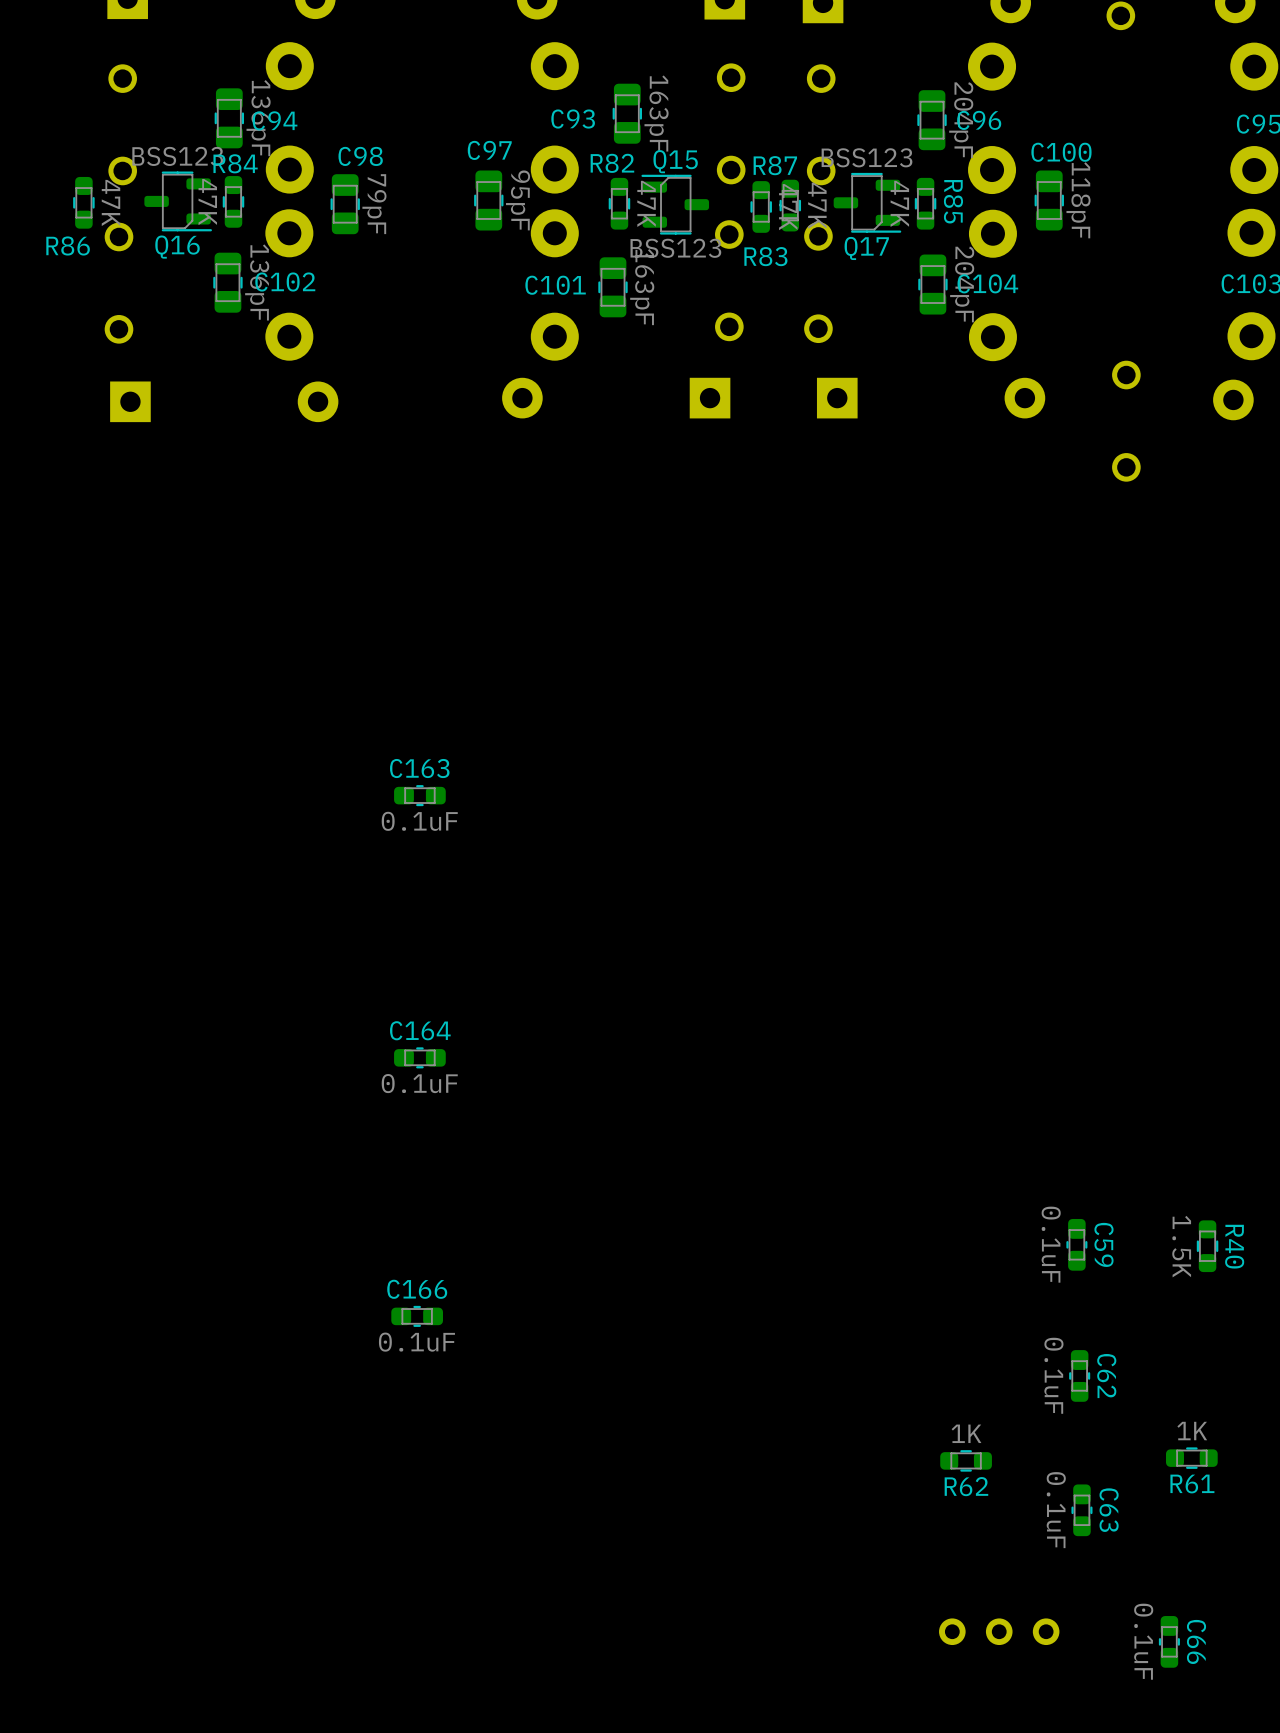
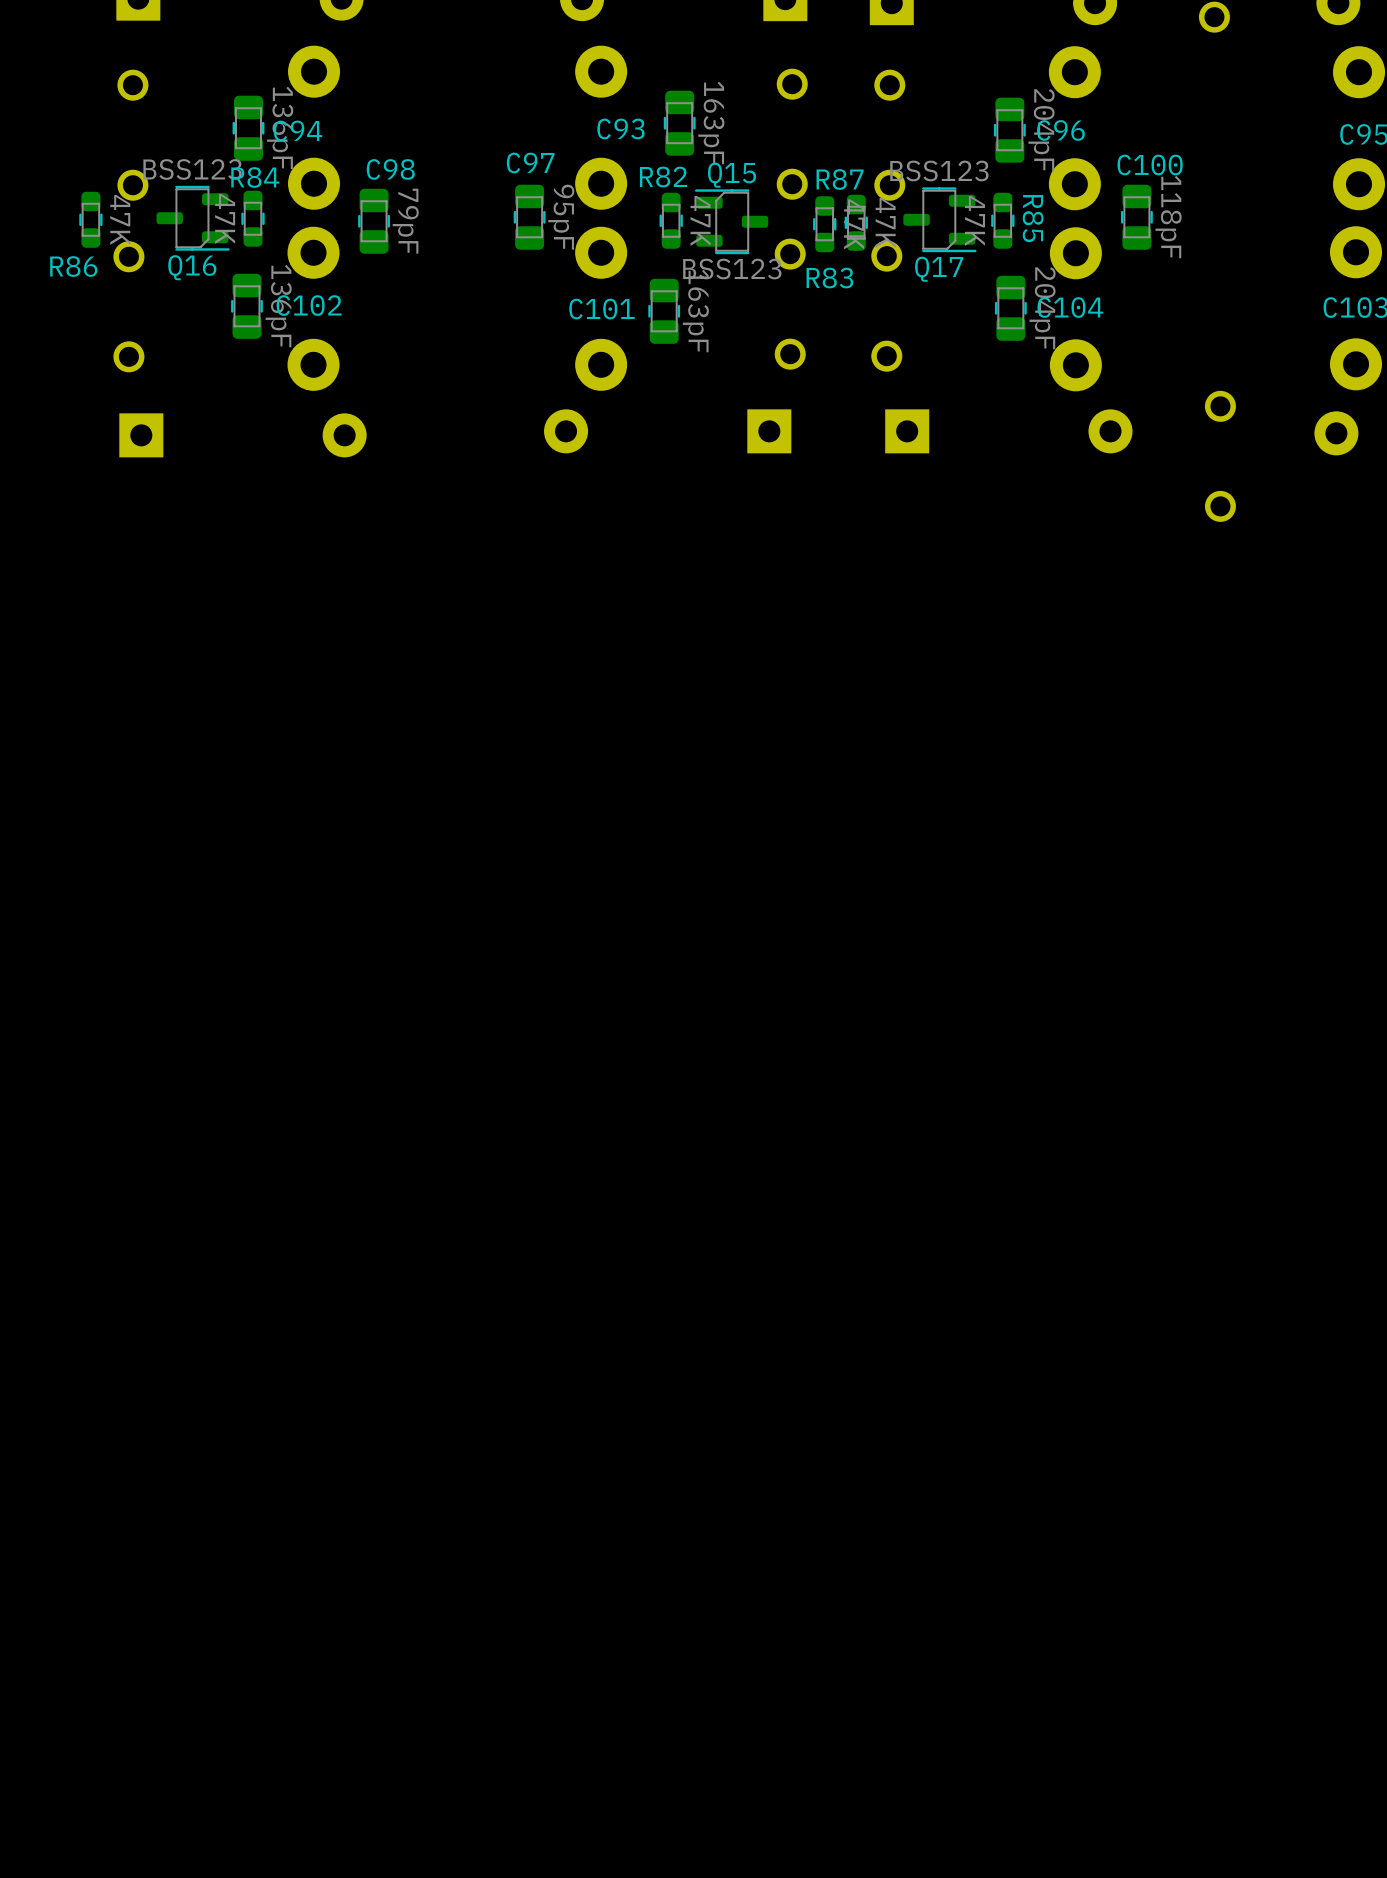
C163: 0.1uF (419, 795) -> none
C164: 0.1uF (419, 1057) -> none
C59: 0.1uF (1076, 1244) -> none
R40: 1.5K (1207, 1246) -> none
C166: 0.1uF (417, 1316) -> none
C62: 0.1uF (1079, 1375) -> none
R61: 1K (1191, 1458) -> none
R62: 1K (966, 1460) -> none
C63: 0.1uF (1081, 1510) -> none
part: (999, 1631) -> none
C66: 0.1uF (1169, 1641) -> none

